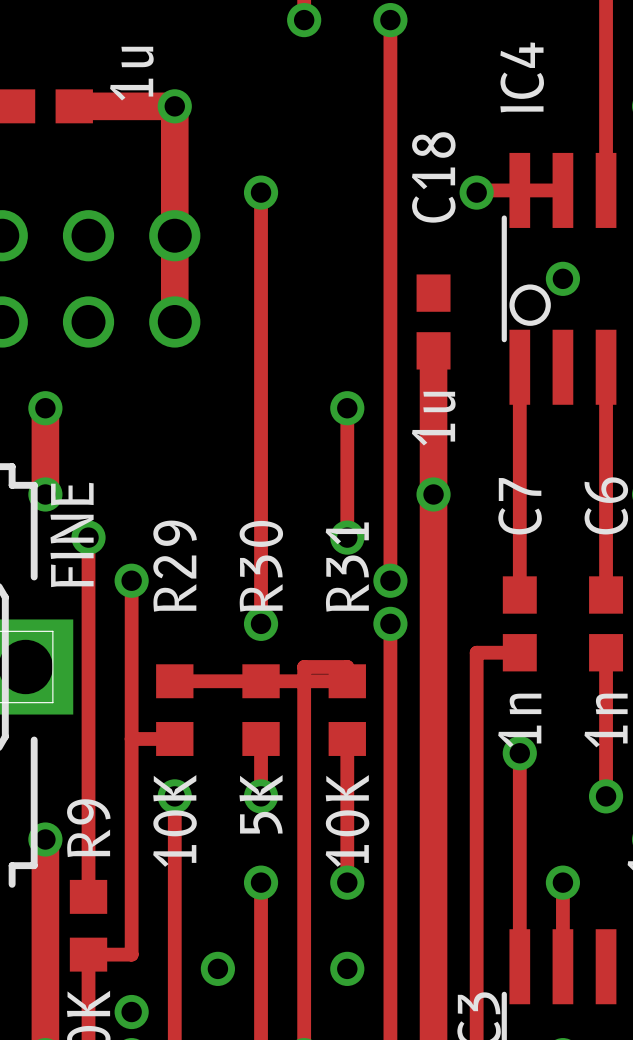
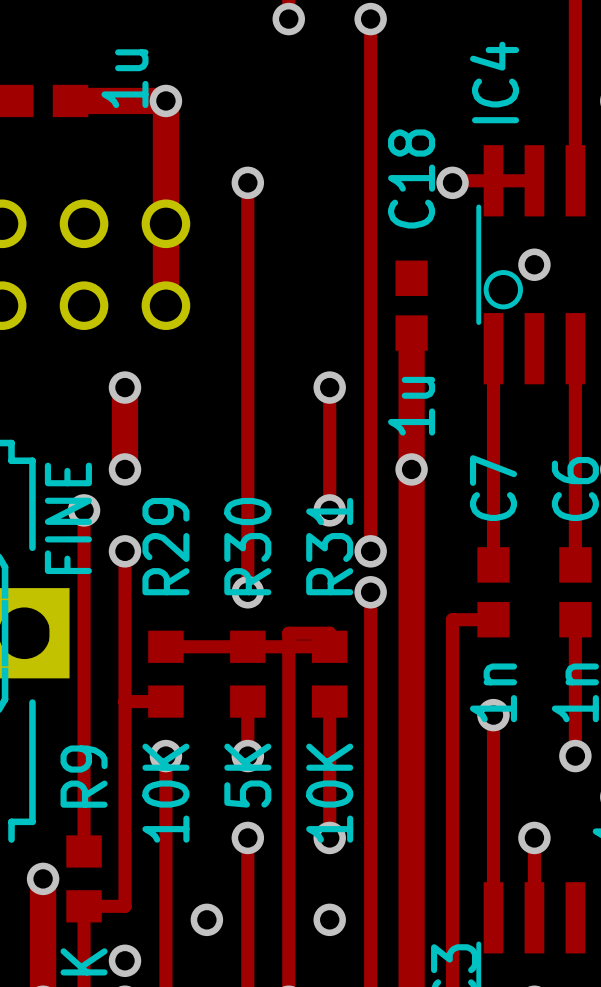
track: (45, 408) (45, 494) -> (124, 387) (124, 469)
via: (45, 408) -> none
via: none -> (124, 387)
via: (45, 494) -> none
via: none -> (124, 469)
track: (45, 839) (45, 925) -> none
via position: (45, 839) -> (43, 878)

